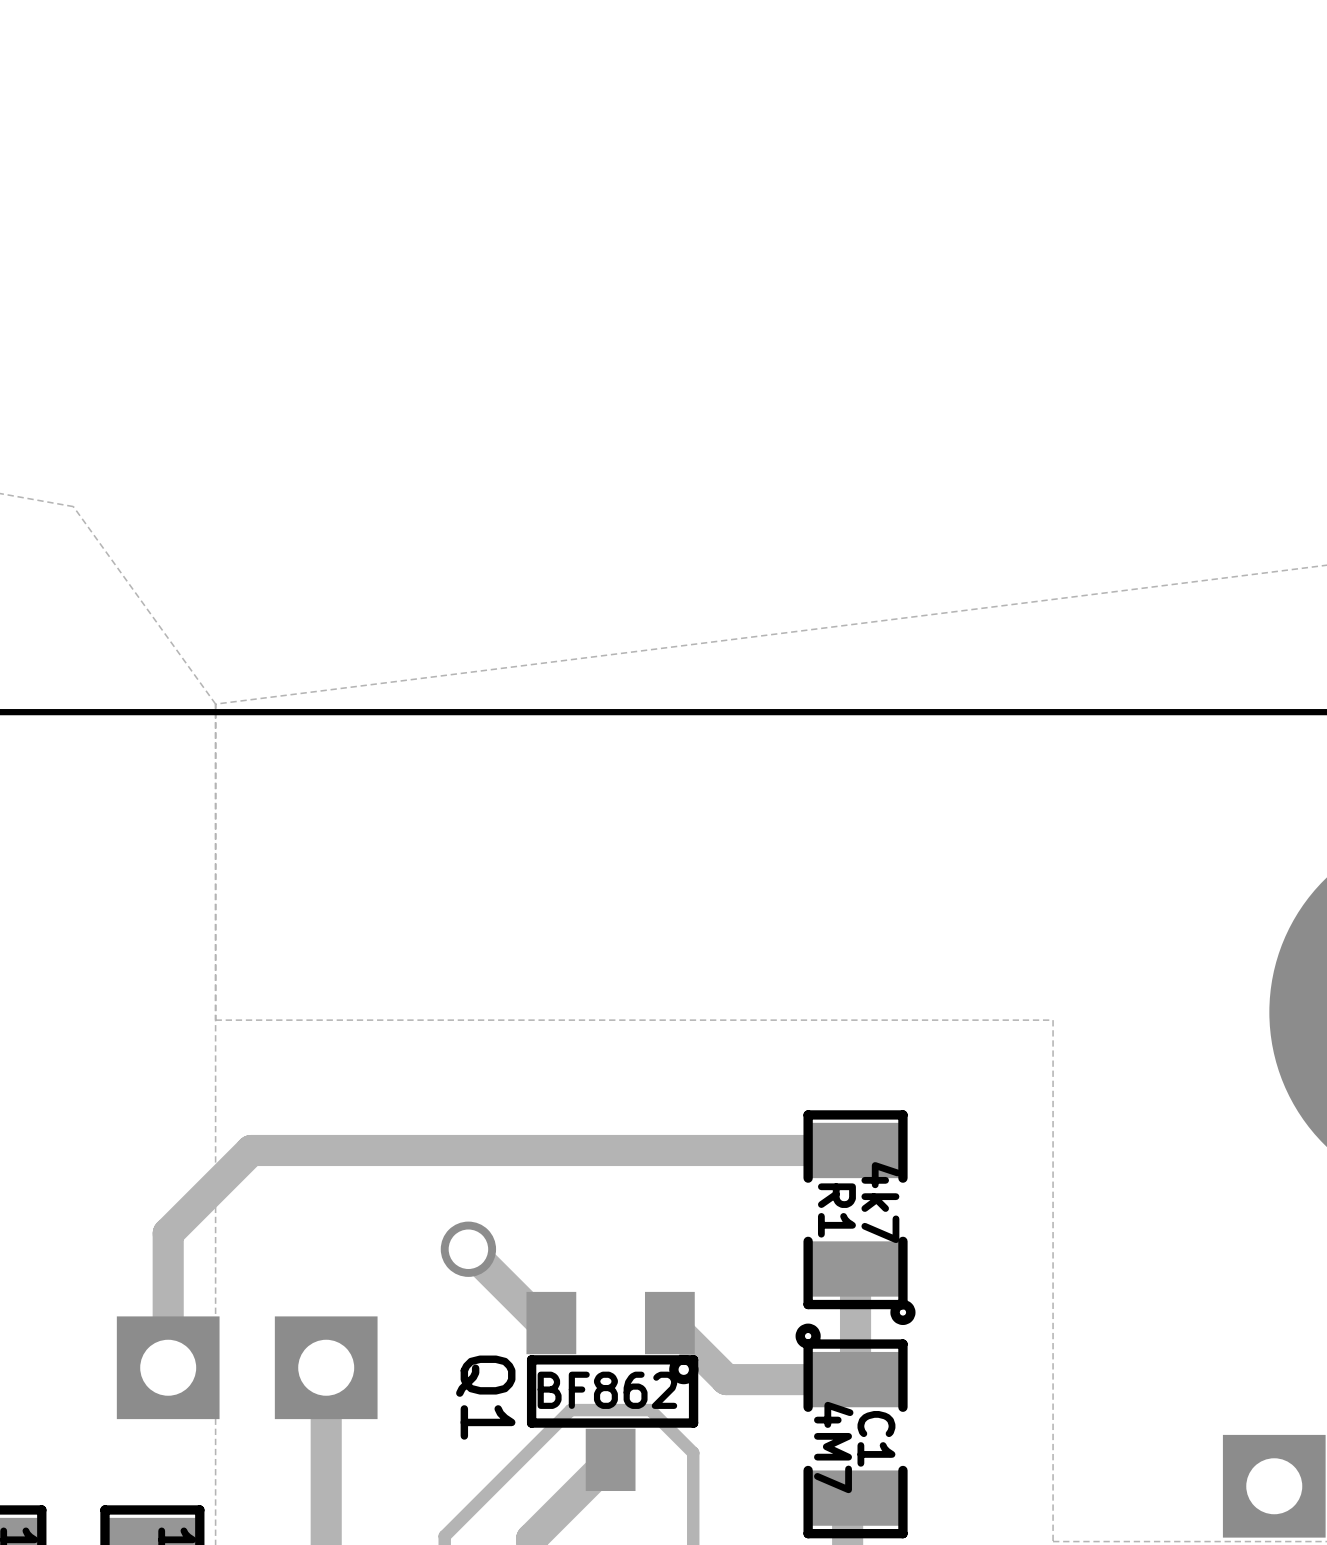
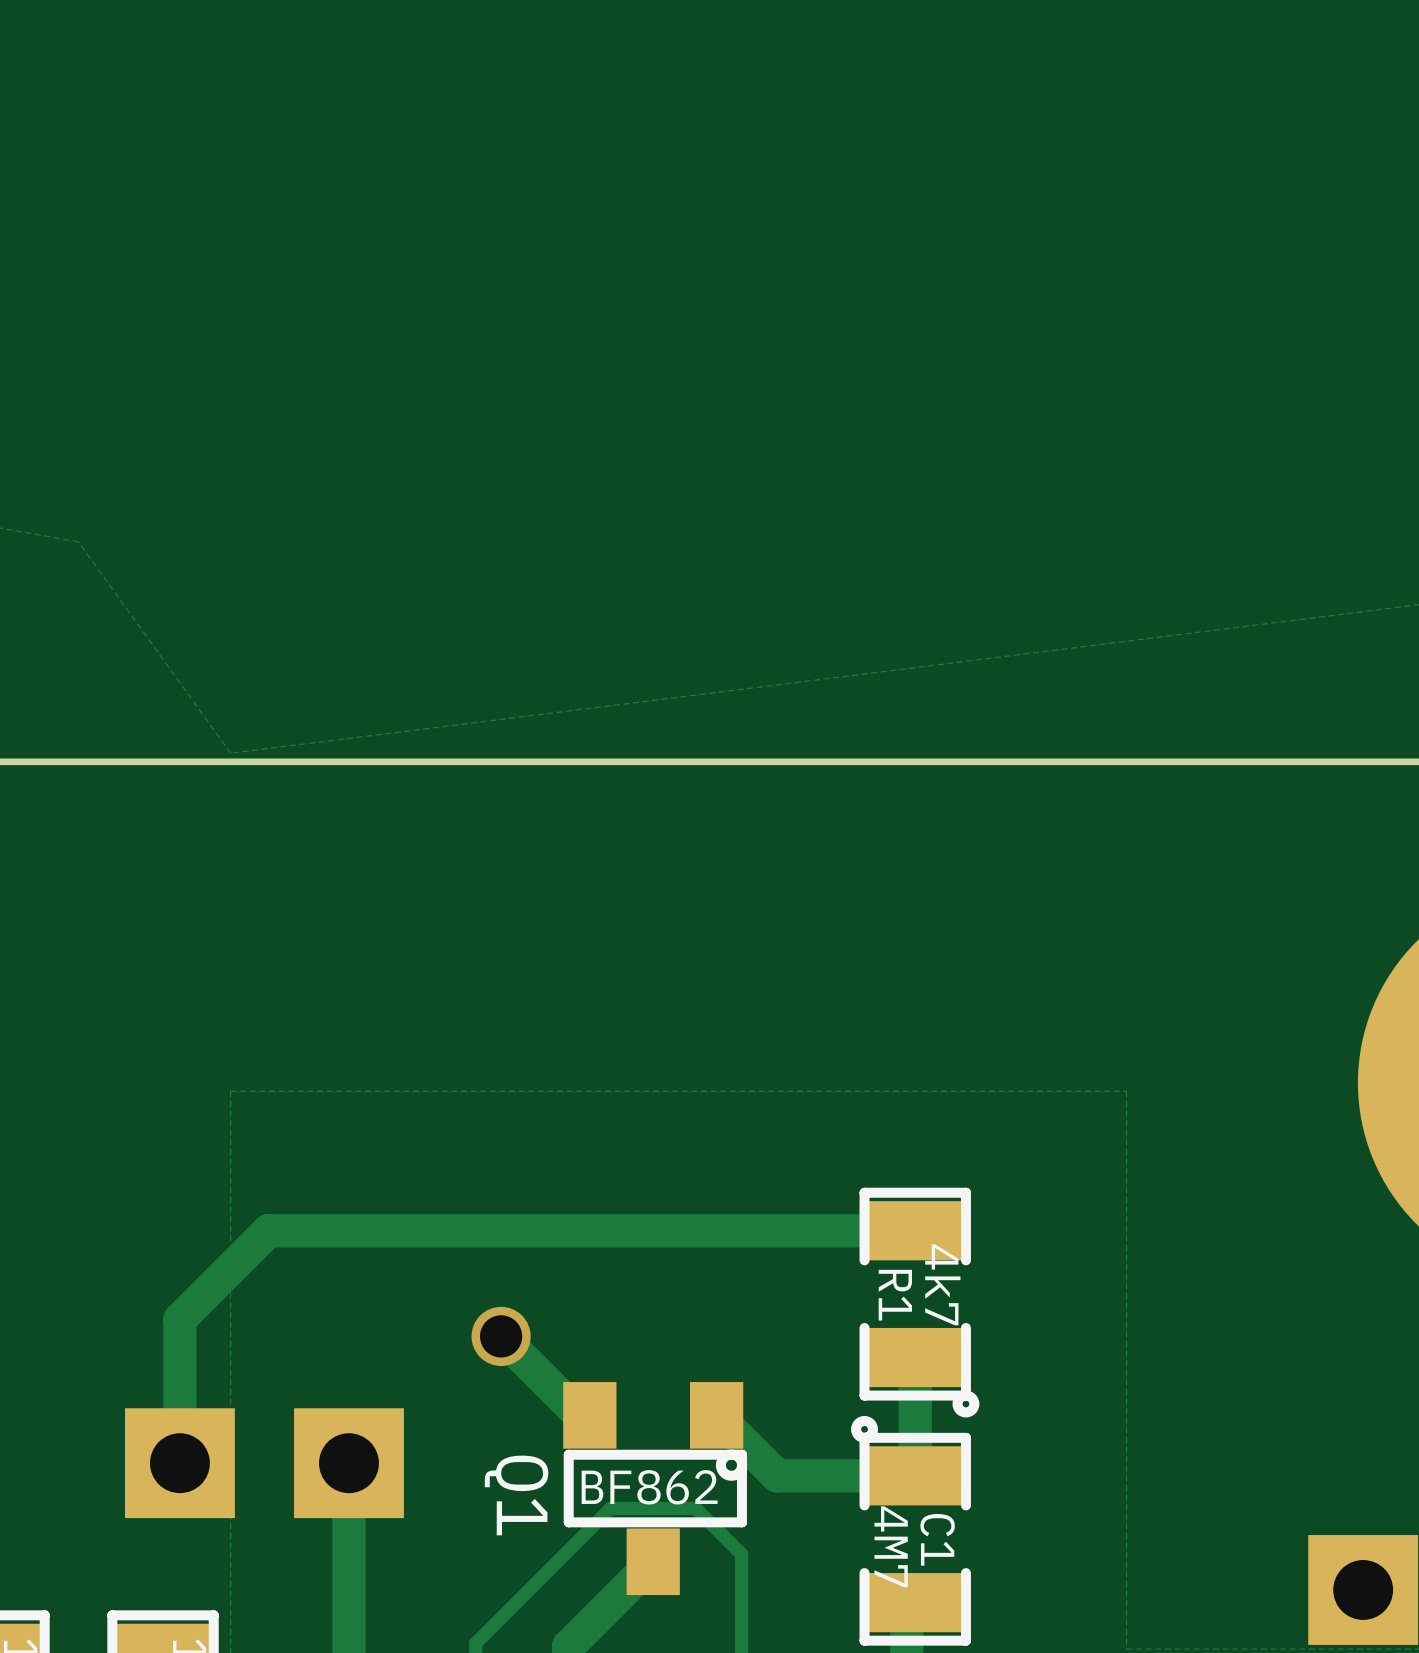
zone outline: (215, 704) (215, 1020) -> none

